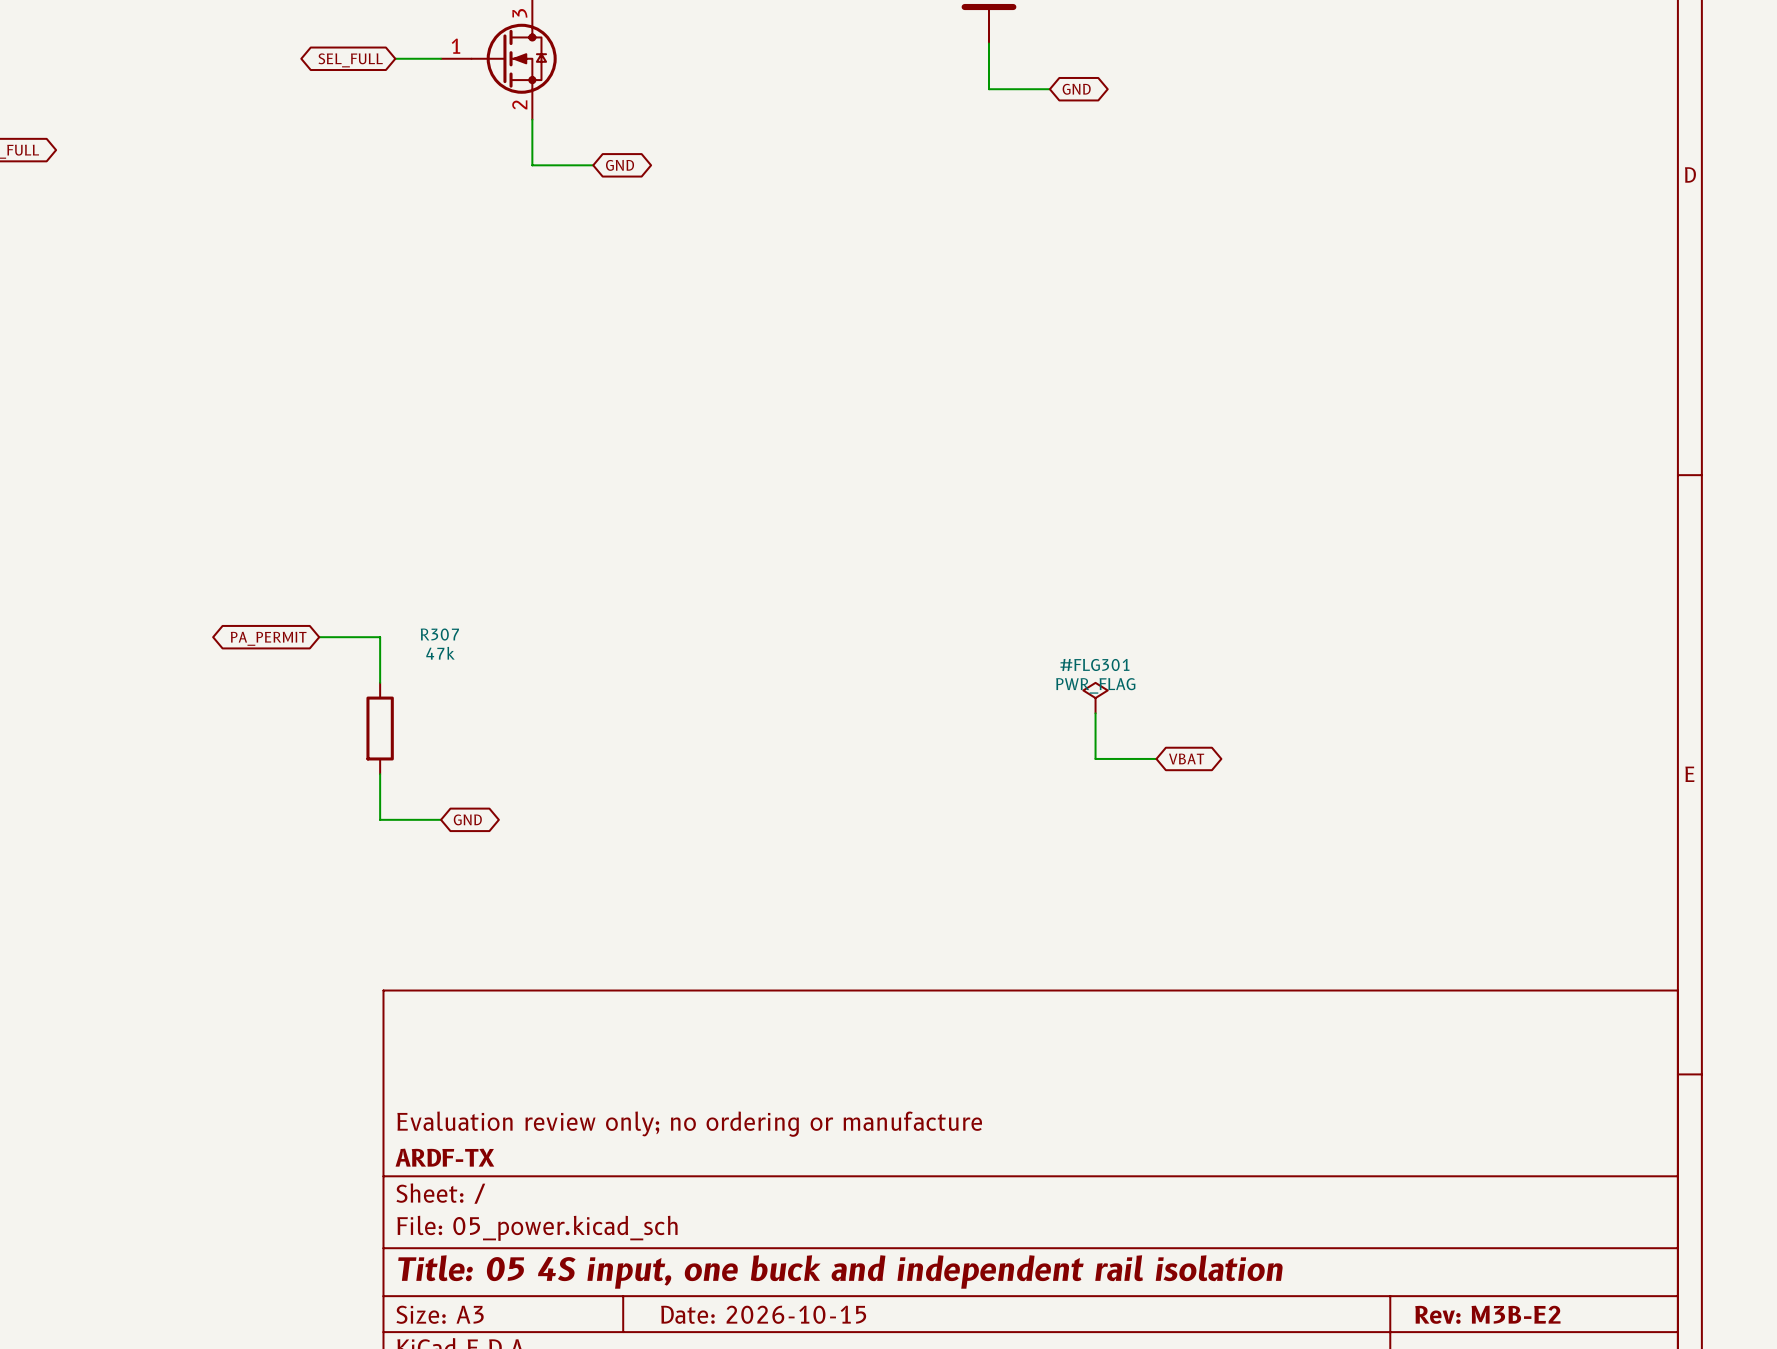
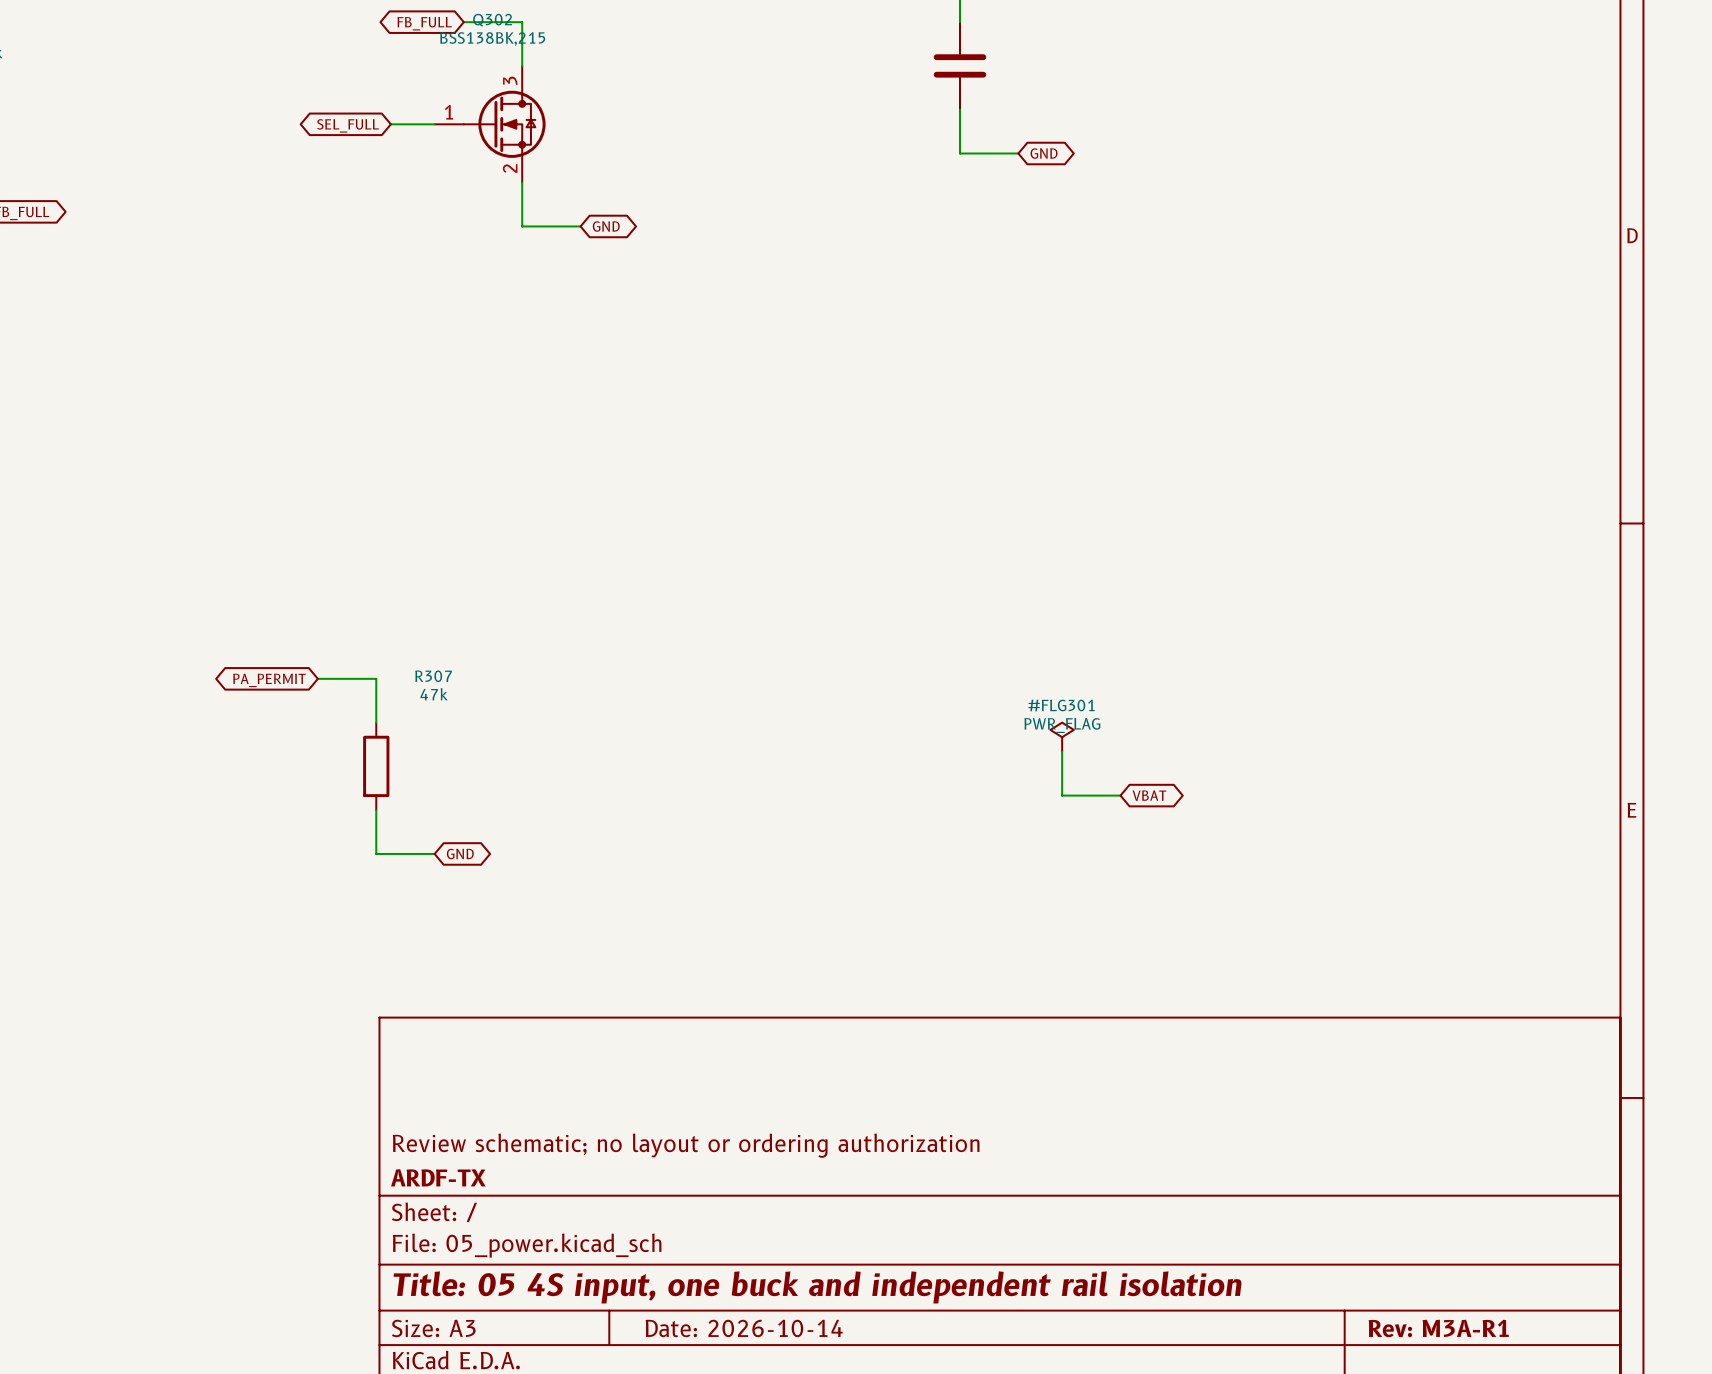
title block: Evaluation review only; no ordering or manufacture (689, 1124) -> Review schematic; no layout or ordering authorization (686, 1145)
title block: Date: 2026-10-15 (763, 1314) -> Date: 2026-10-14 (744, 1328)
title block: Rev: M3B-E2 (1487, 1314) -> Rev: M3A-R1 (1438, 1328)

